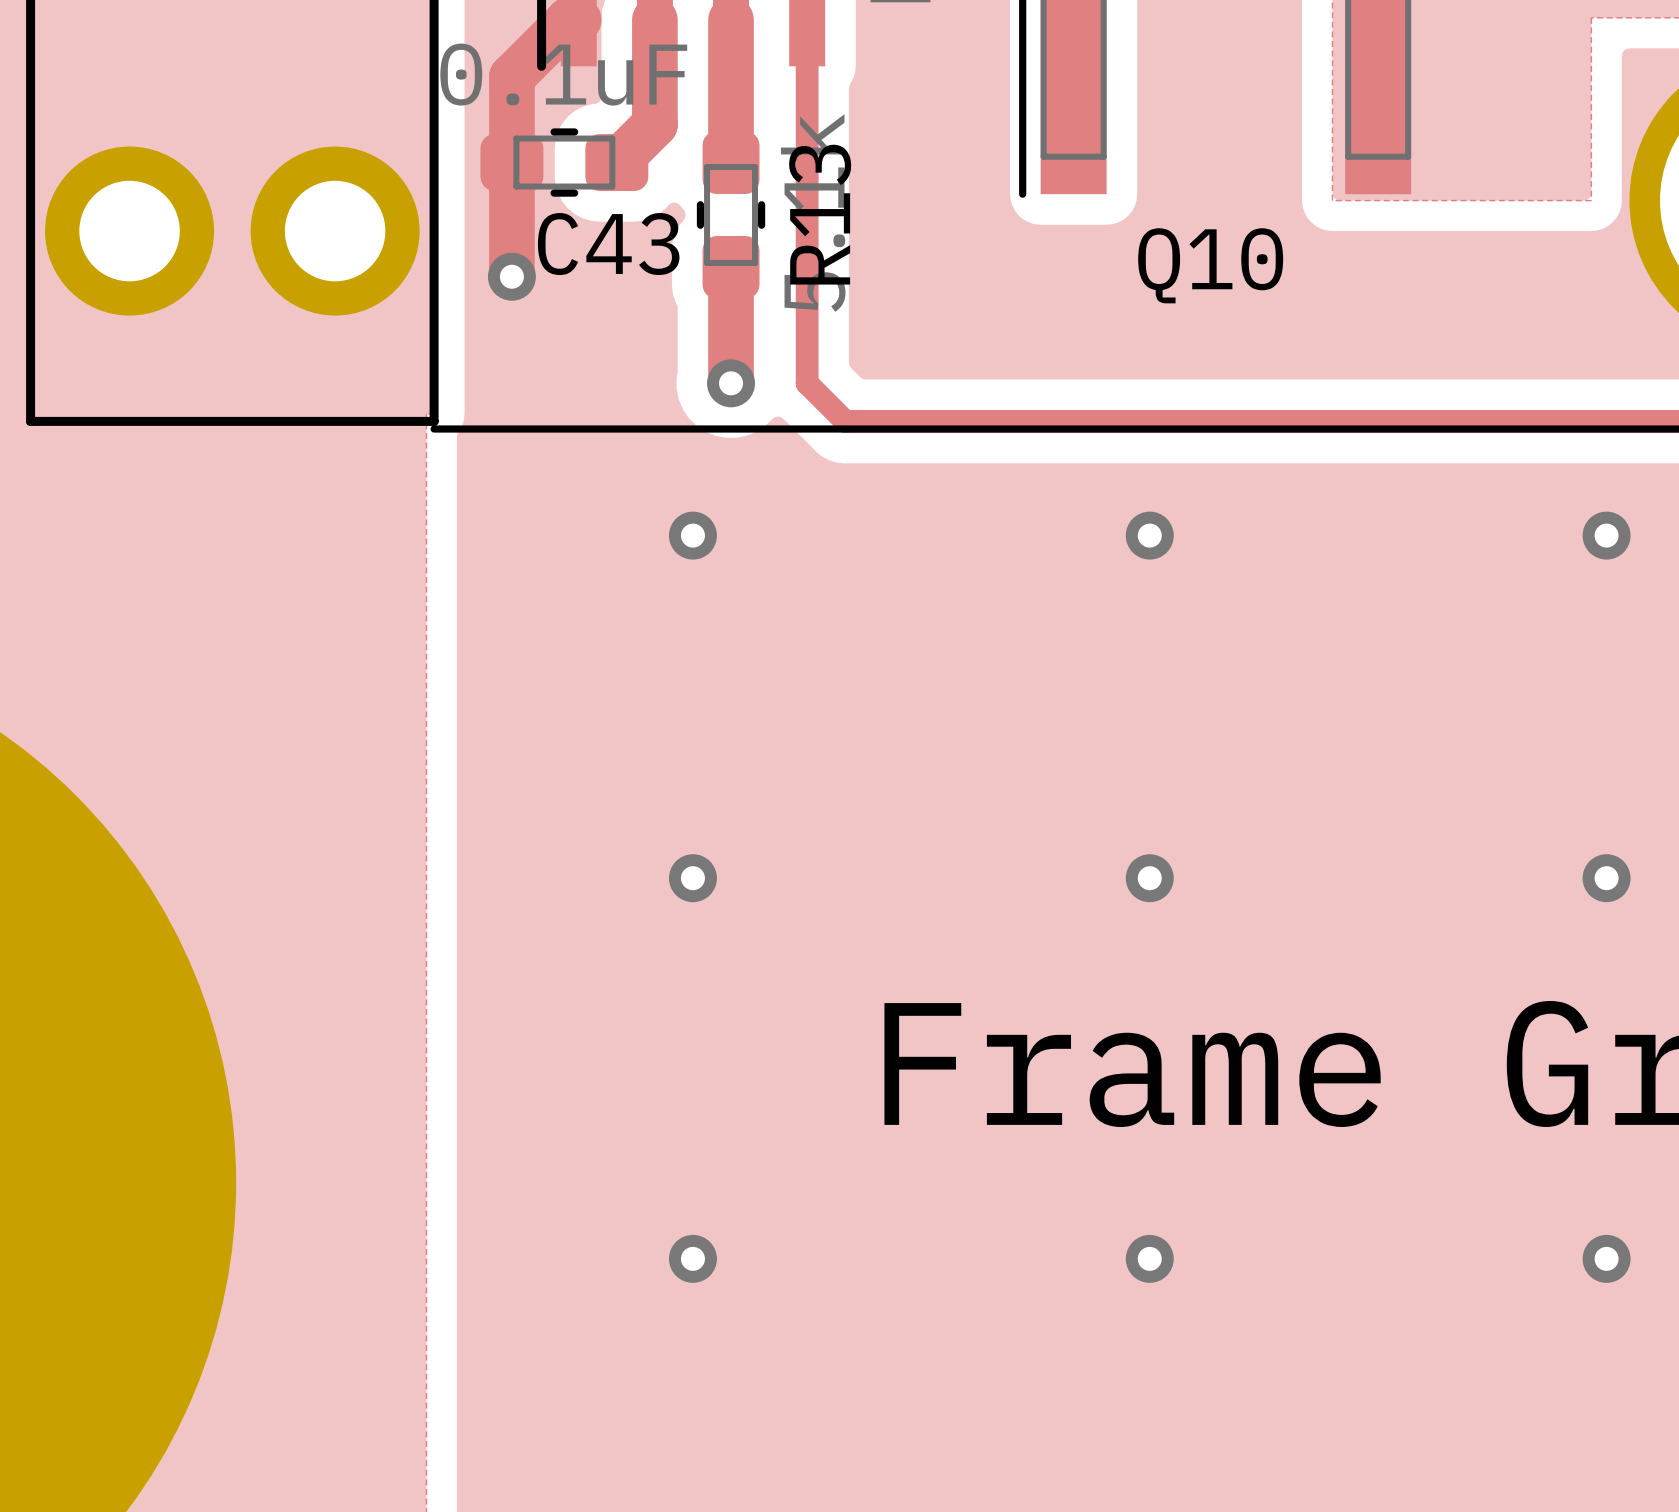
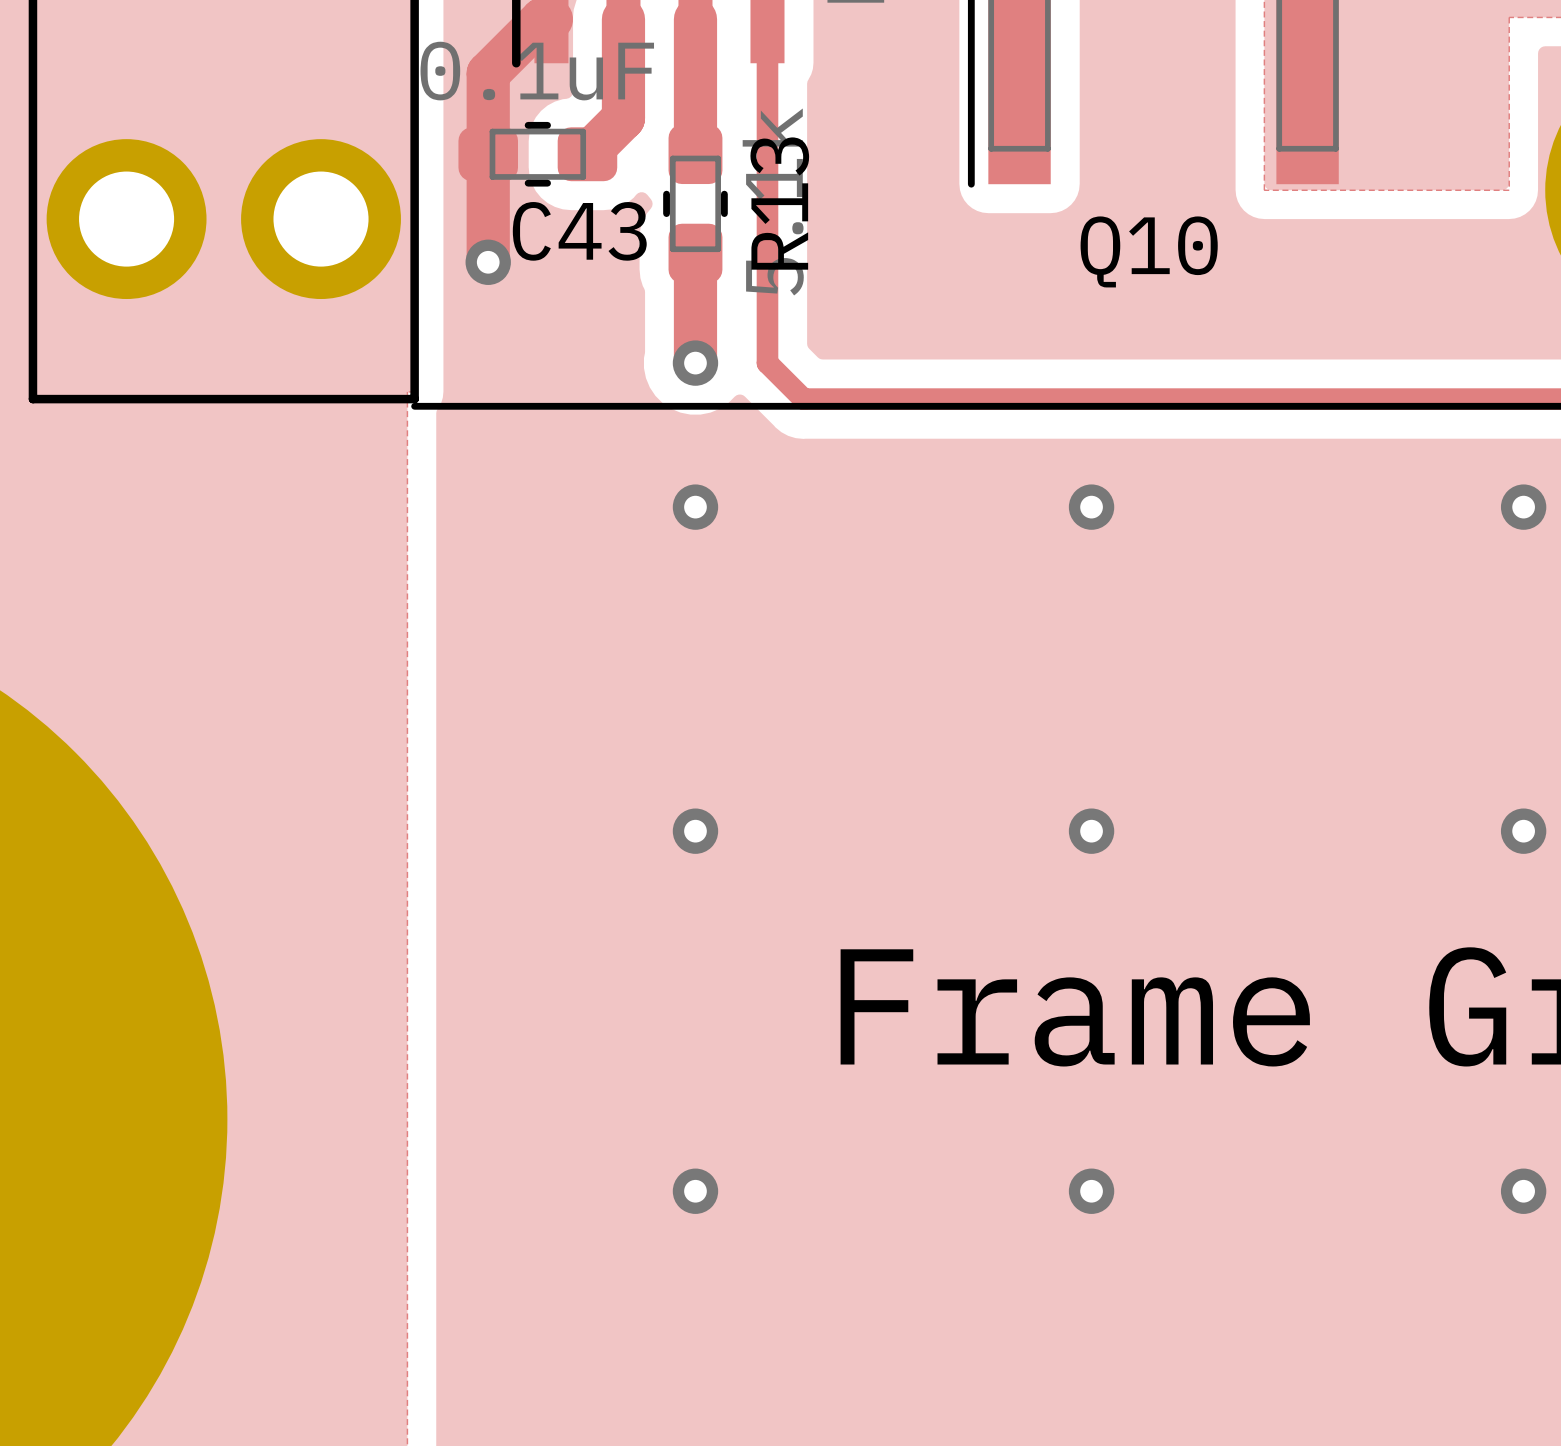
via position: (692, 535) -> (695, 507)
via position: (692, 878) -> (695, 831)
via position: (692, 1258) -> (695, 1191)

